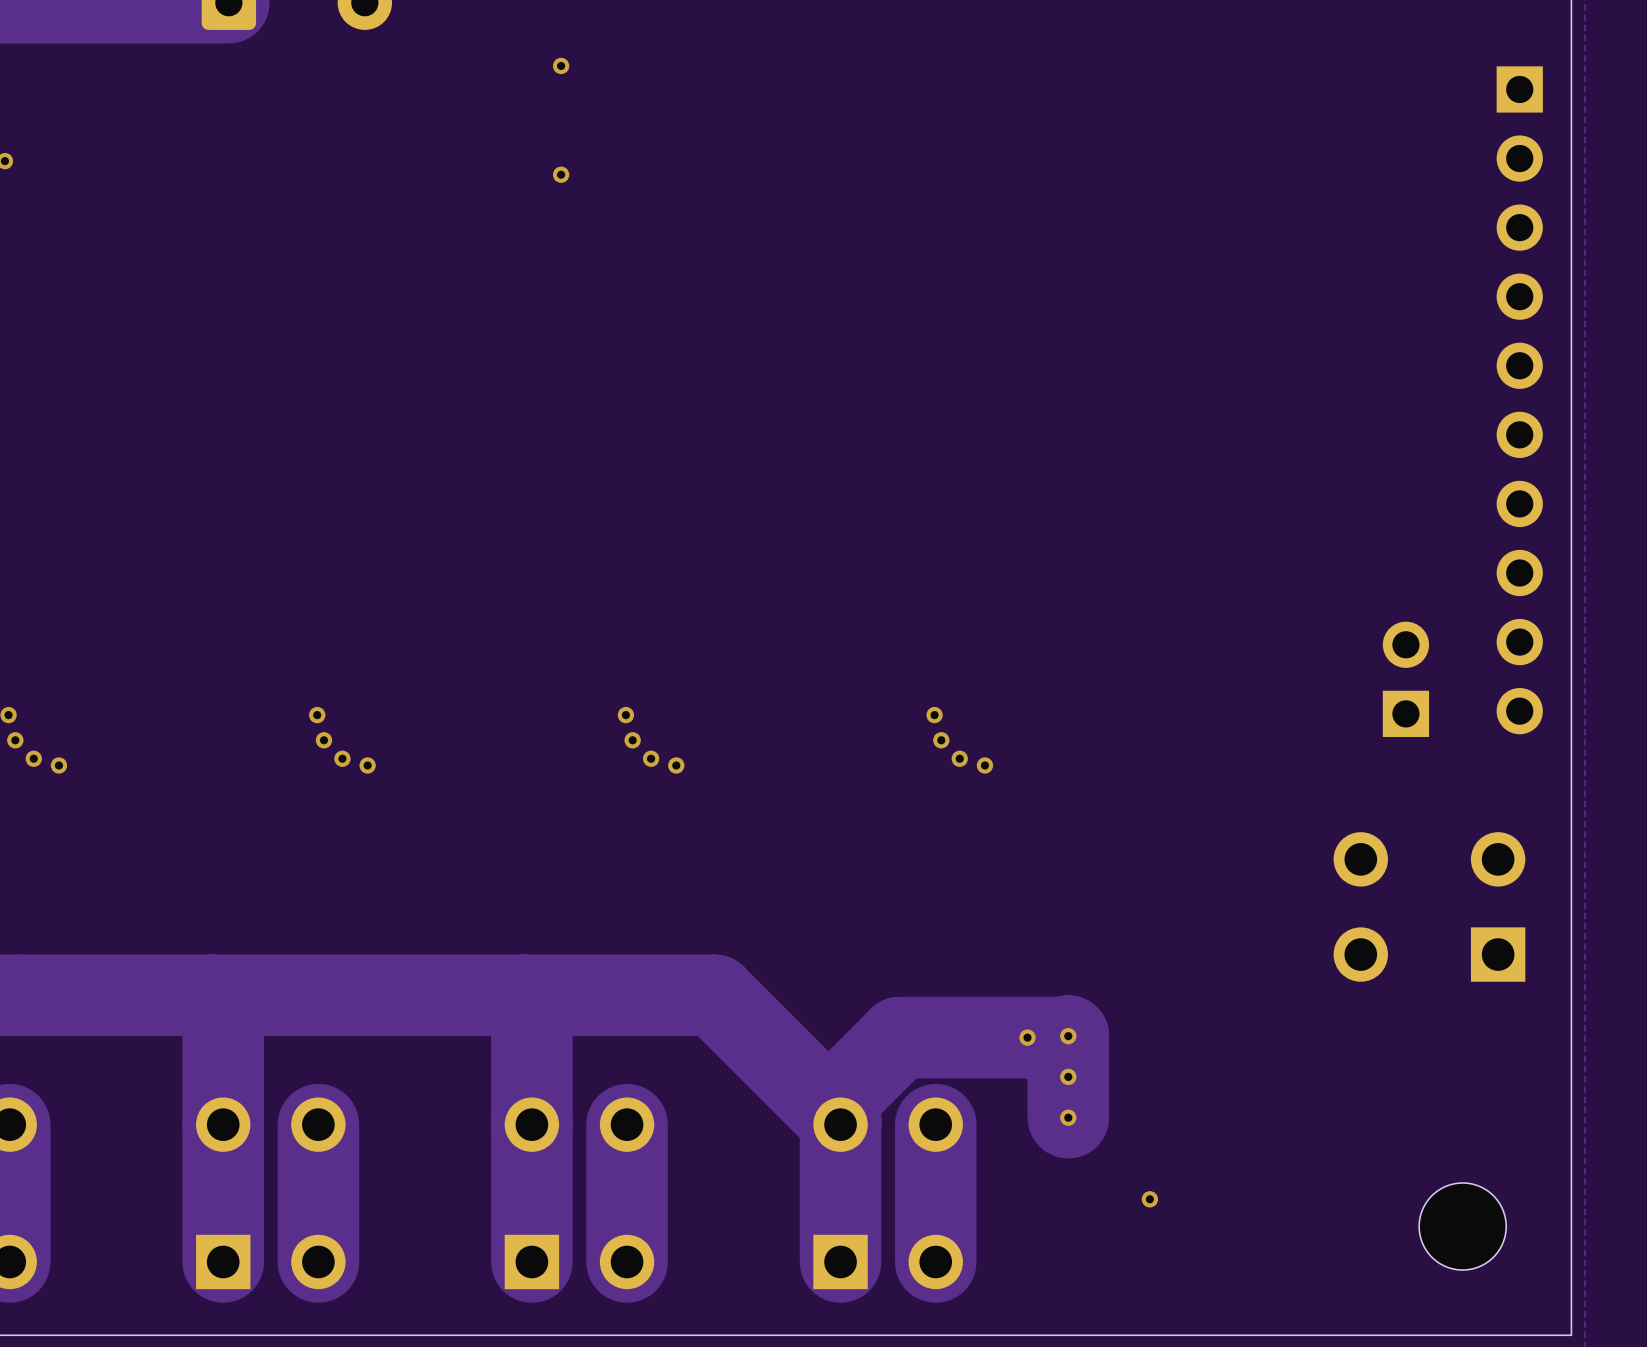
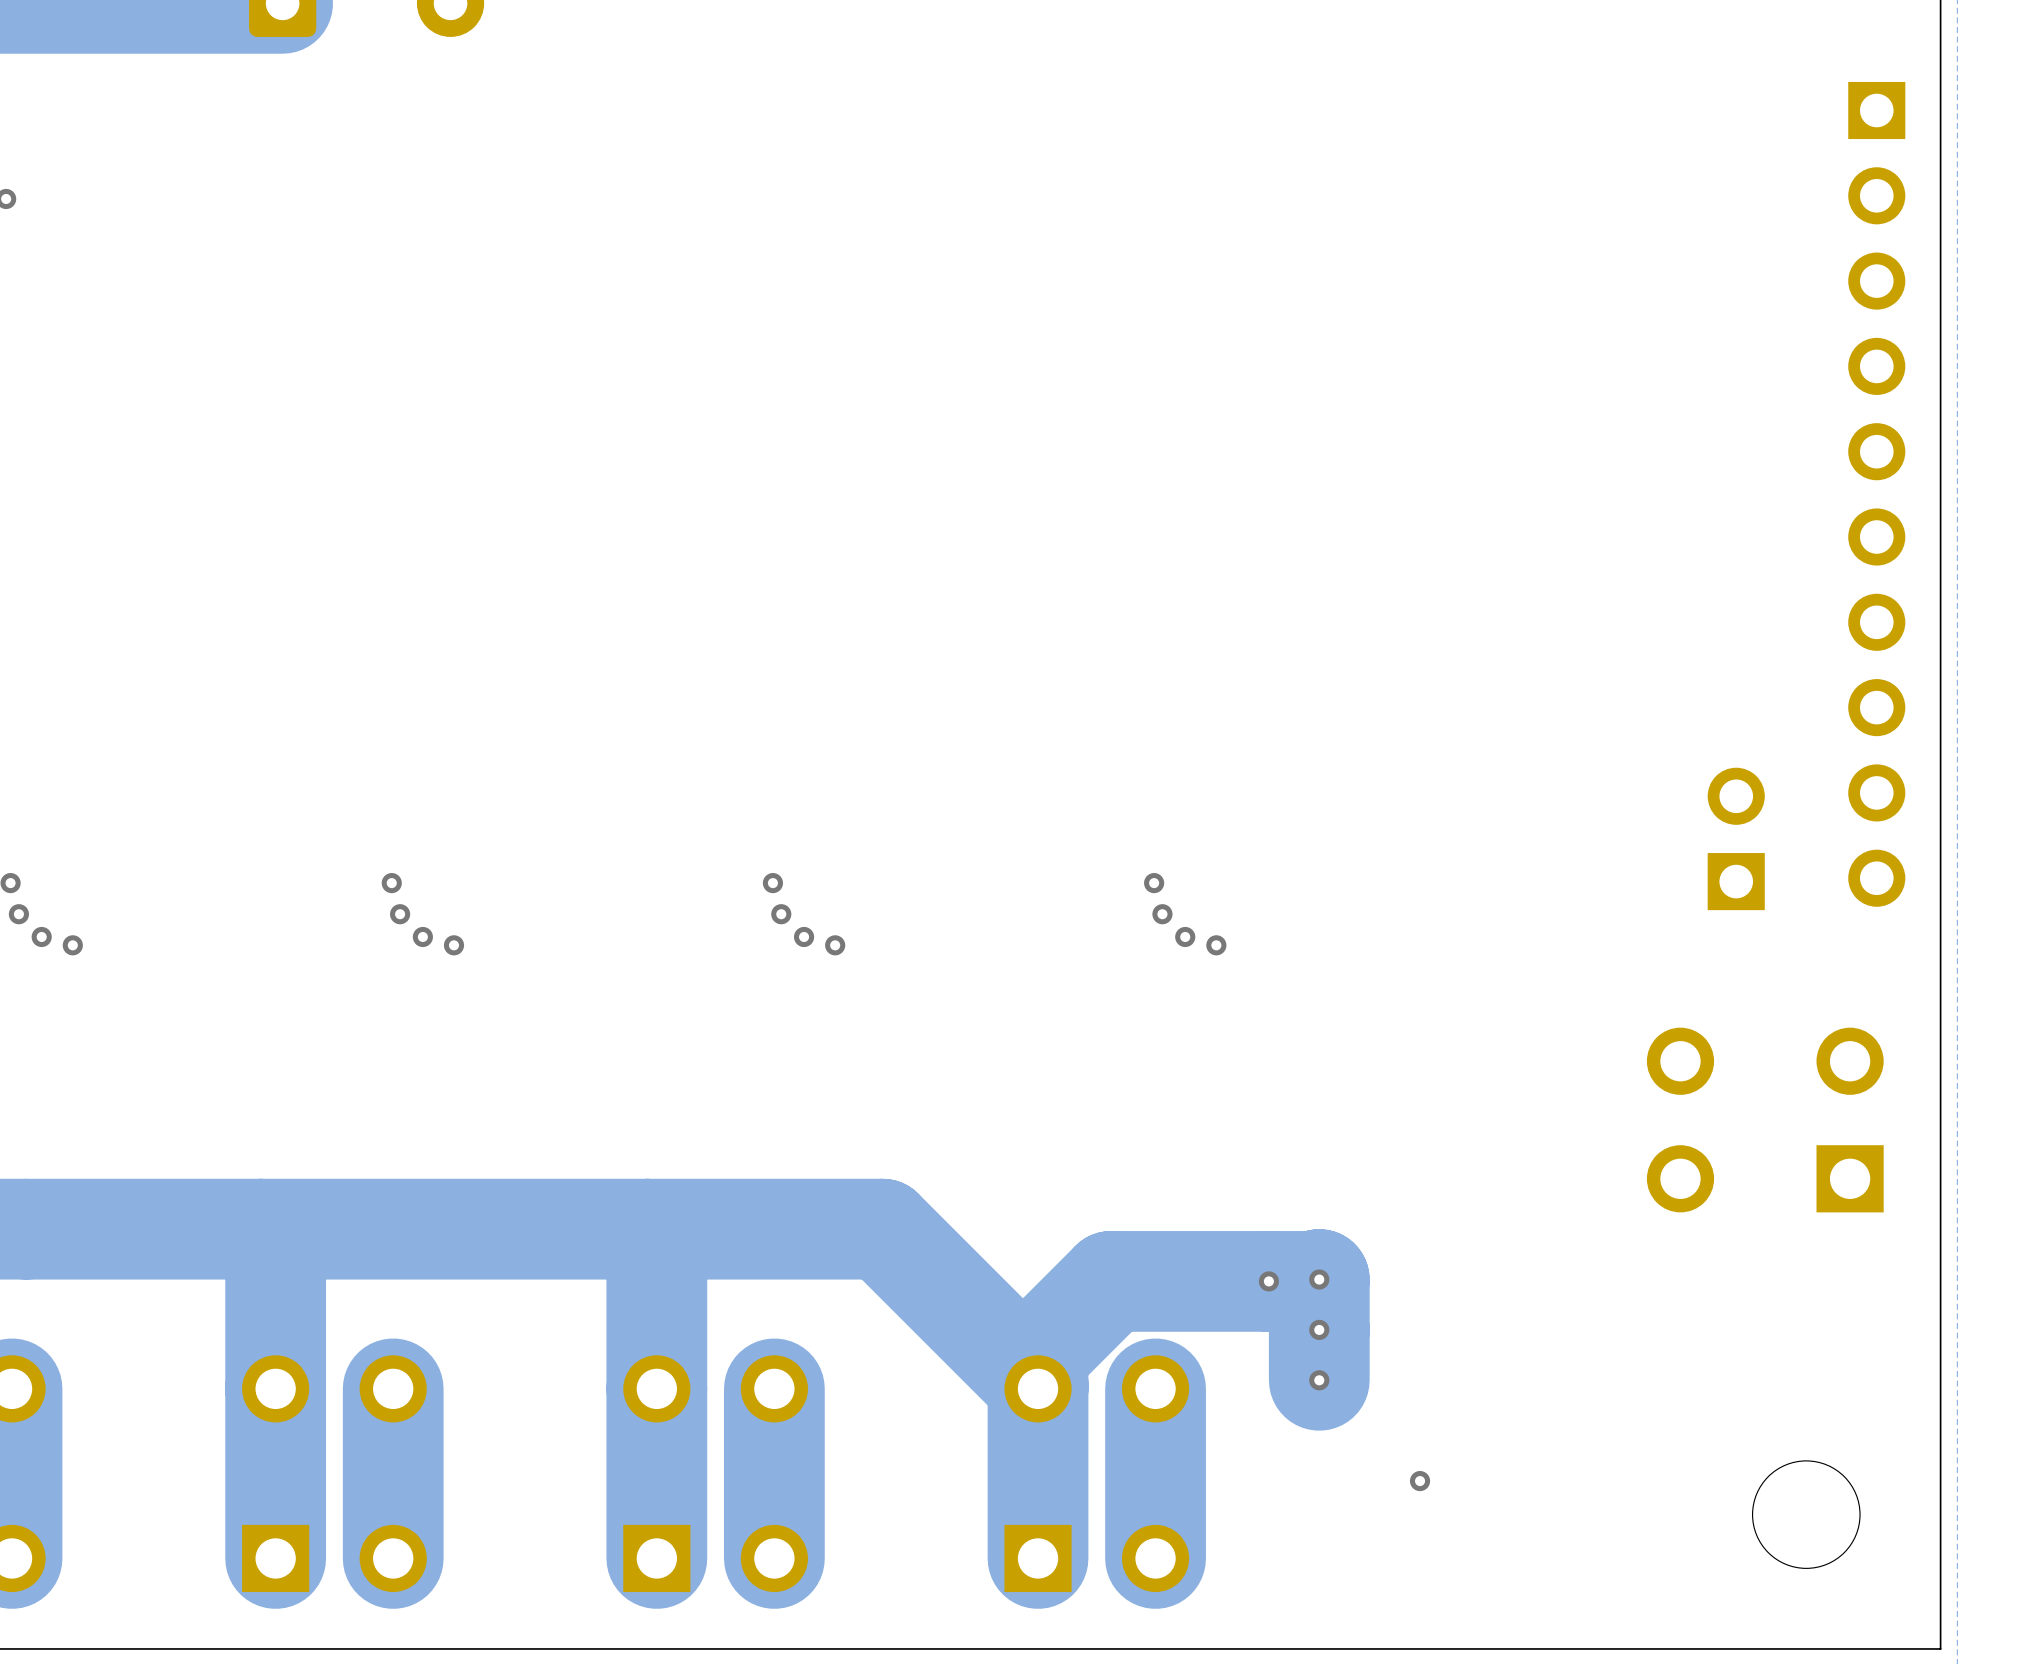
via: (561, 65) -> none
via: (561, 174) -> none

